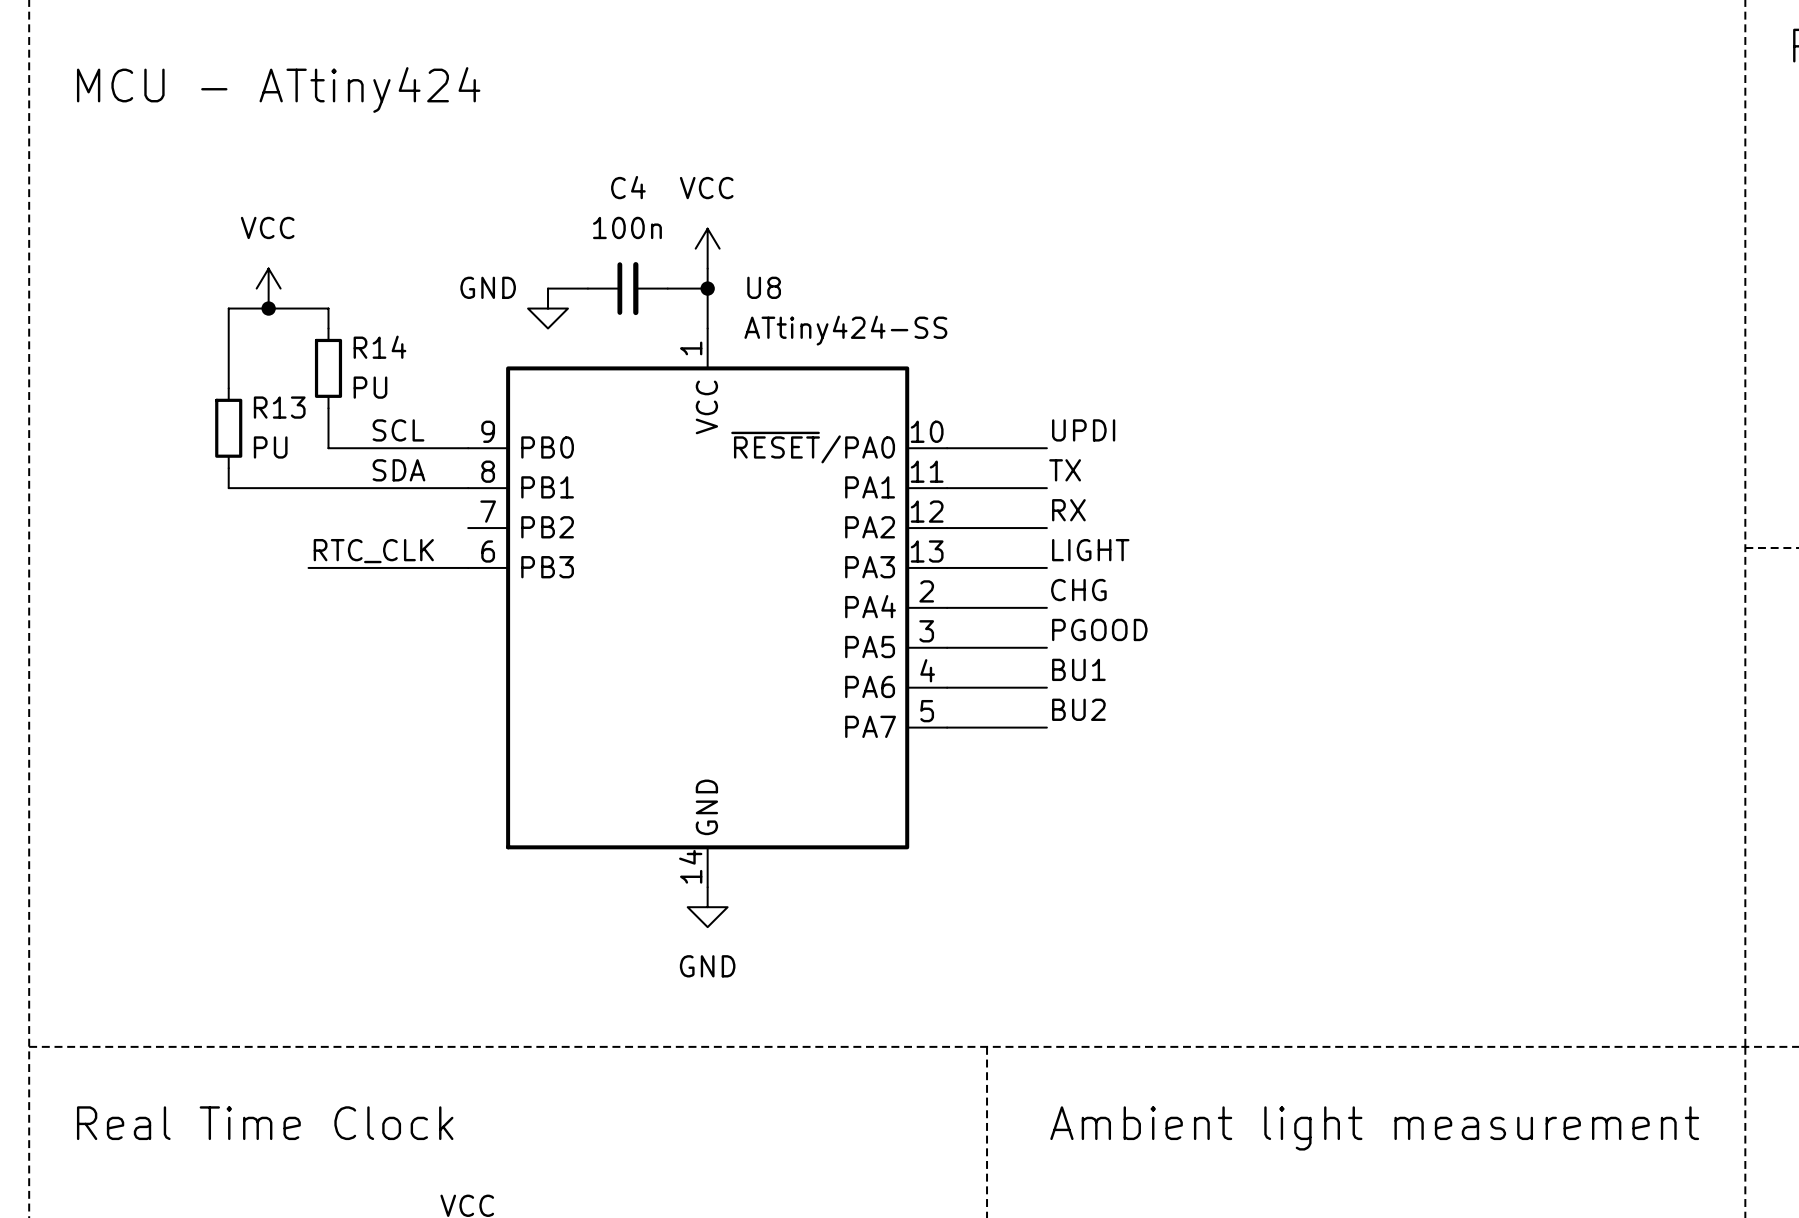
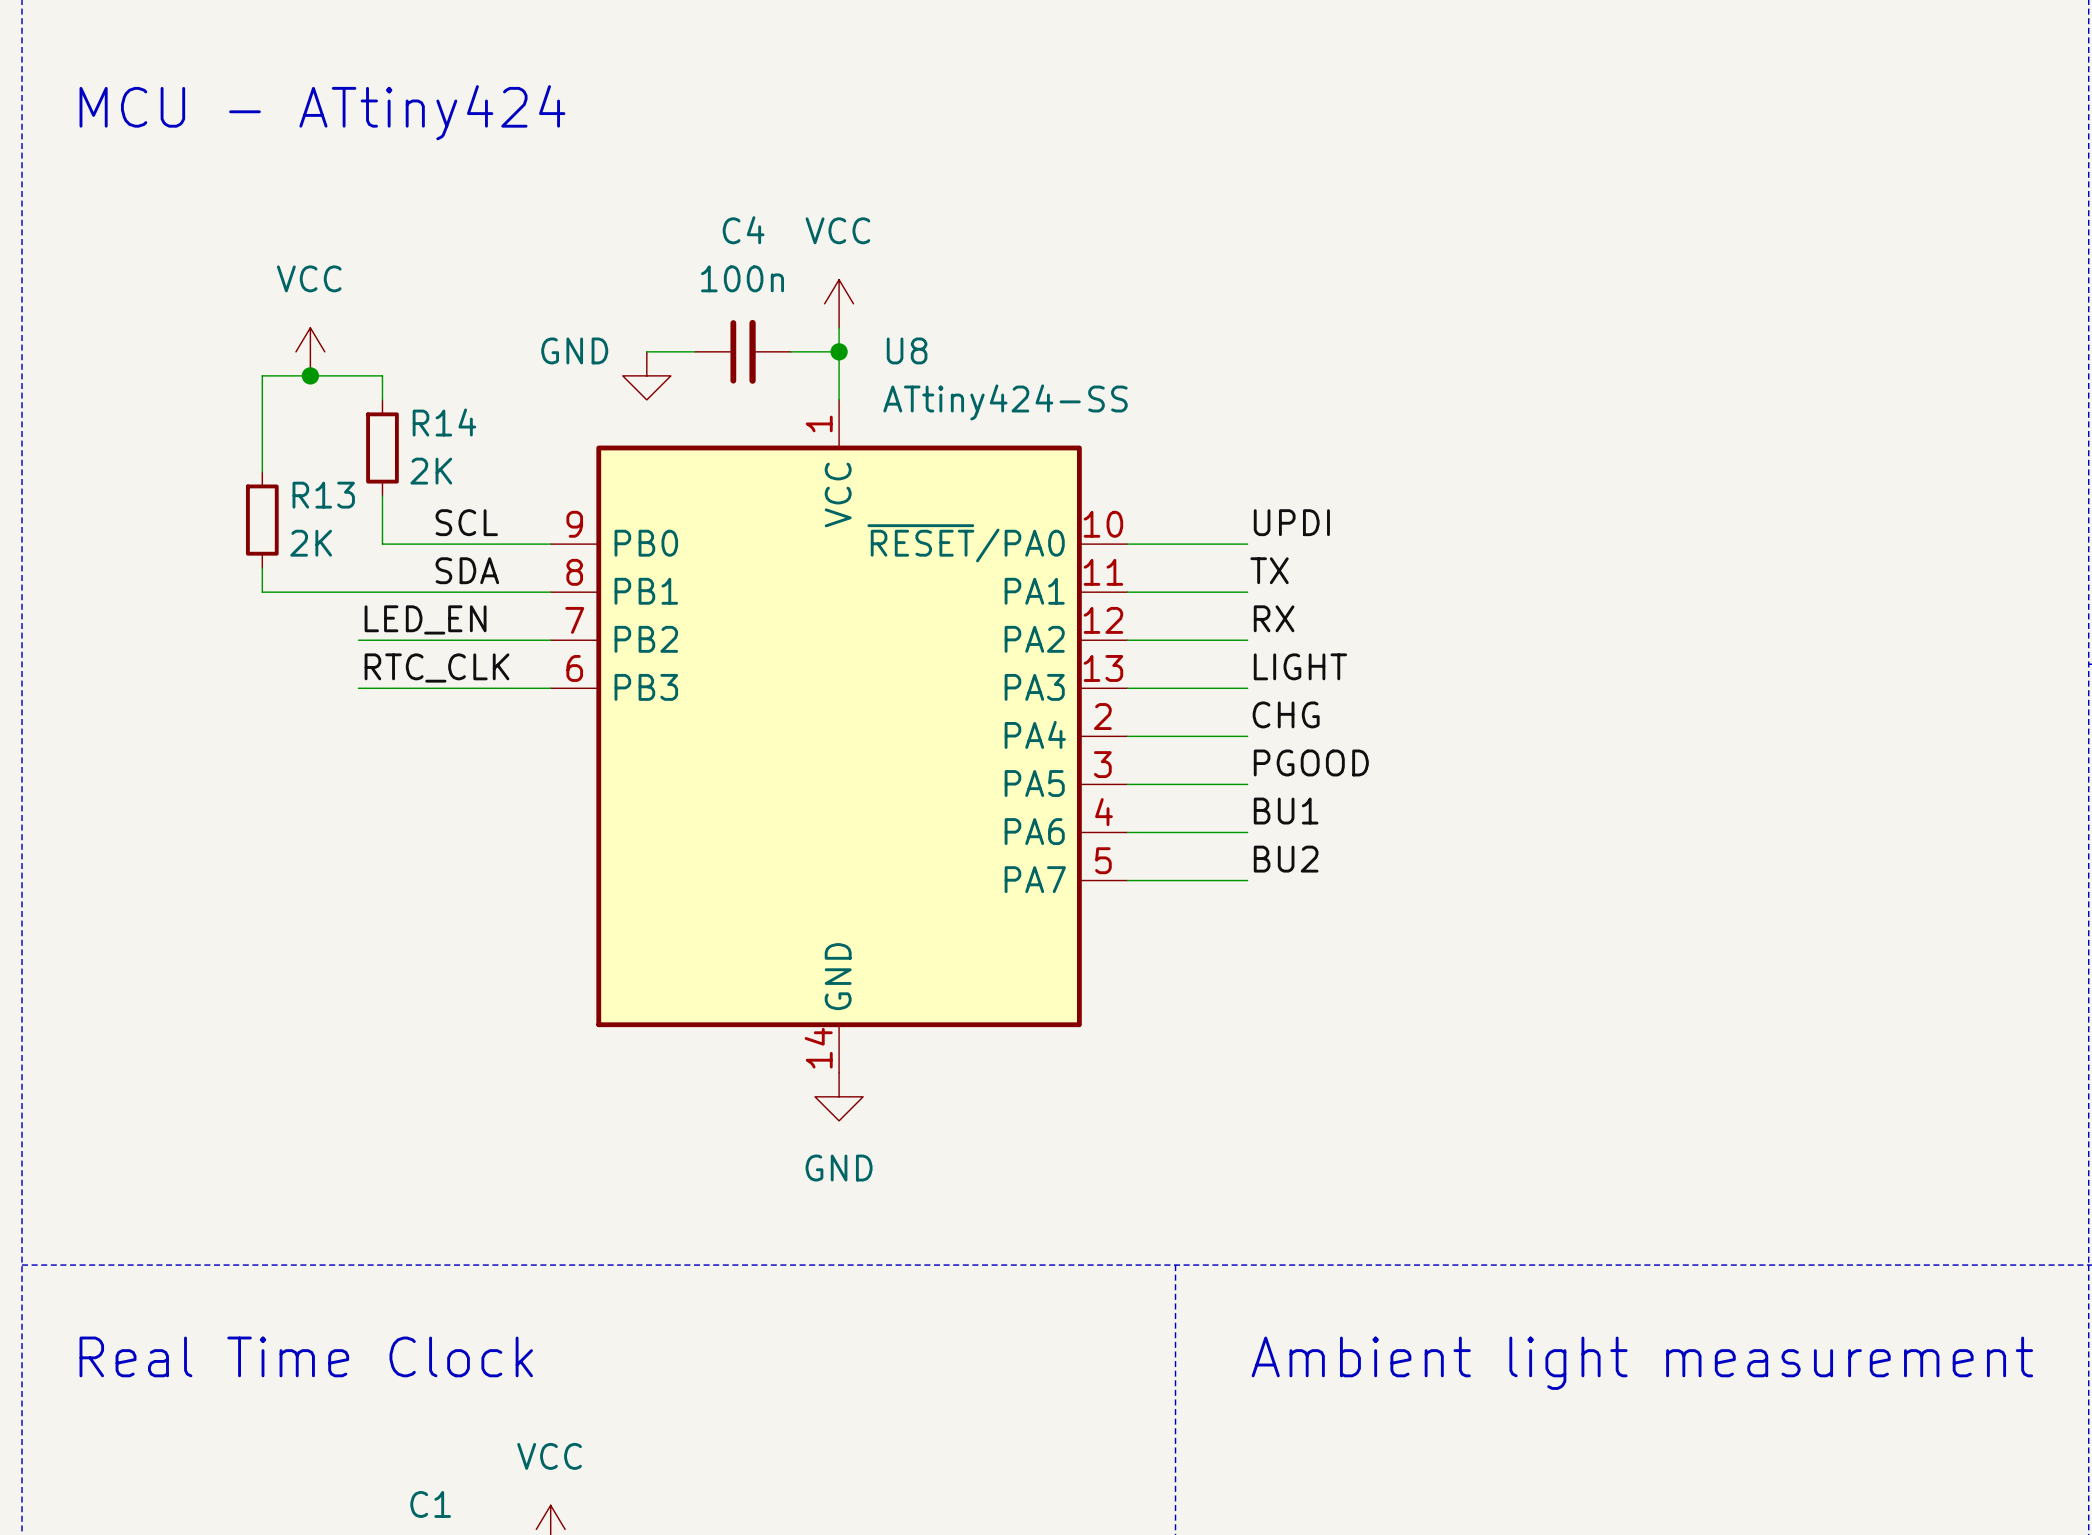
R14 value: PU (370, 387) -> 2K (431, 471)
R13 value: PU (270, 447) -> 2K (311, 543)
label: none -> LED_EN (425, 619)
wire: none -> (358, 640) (550, 640)

